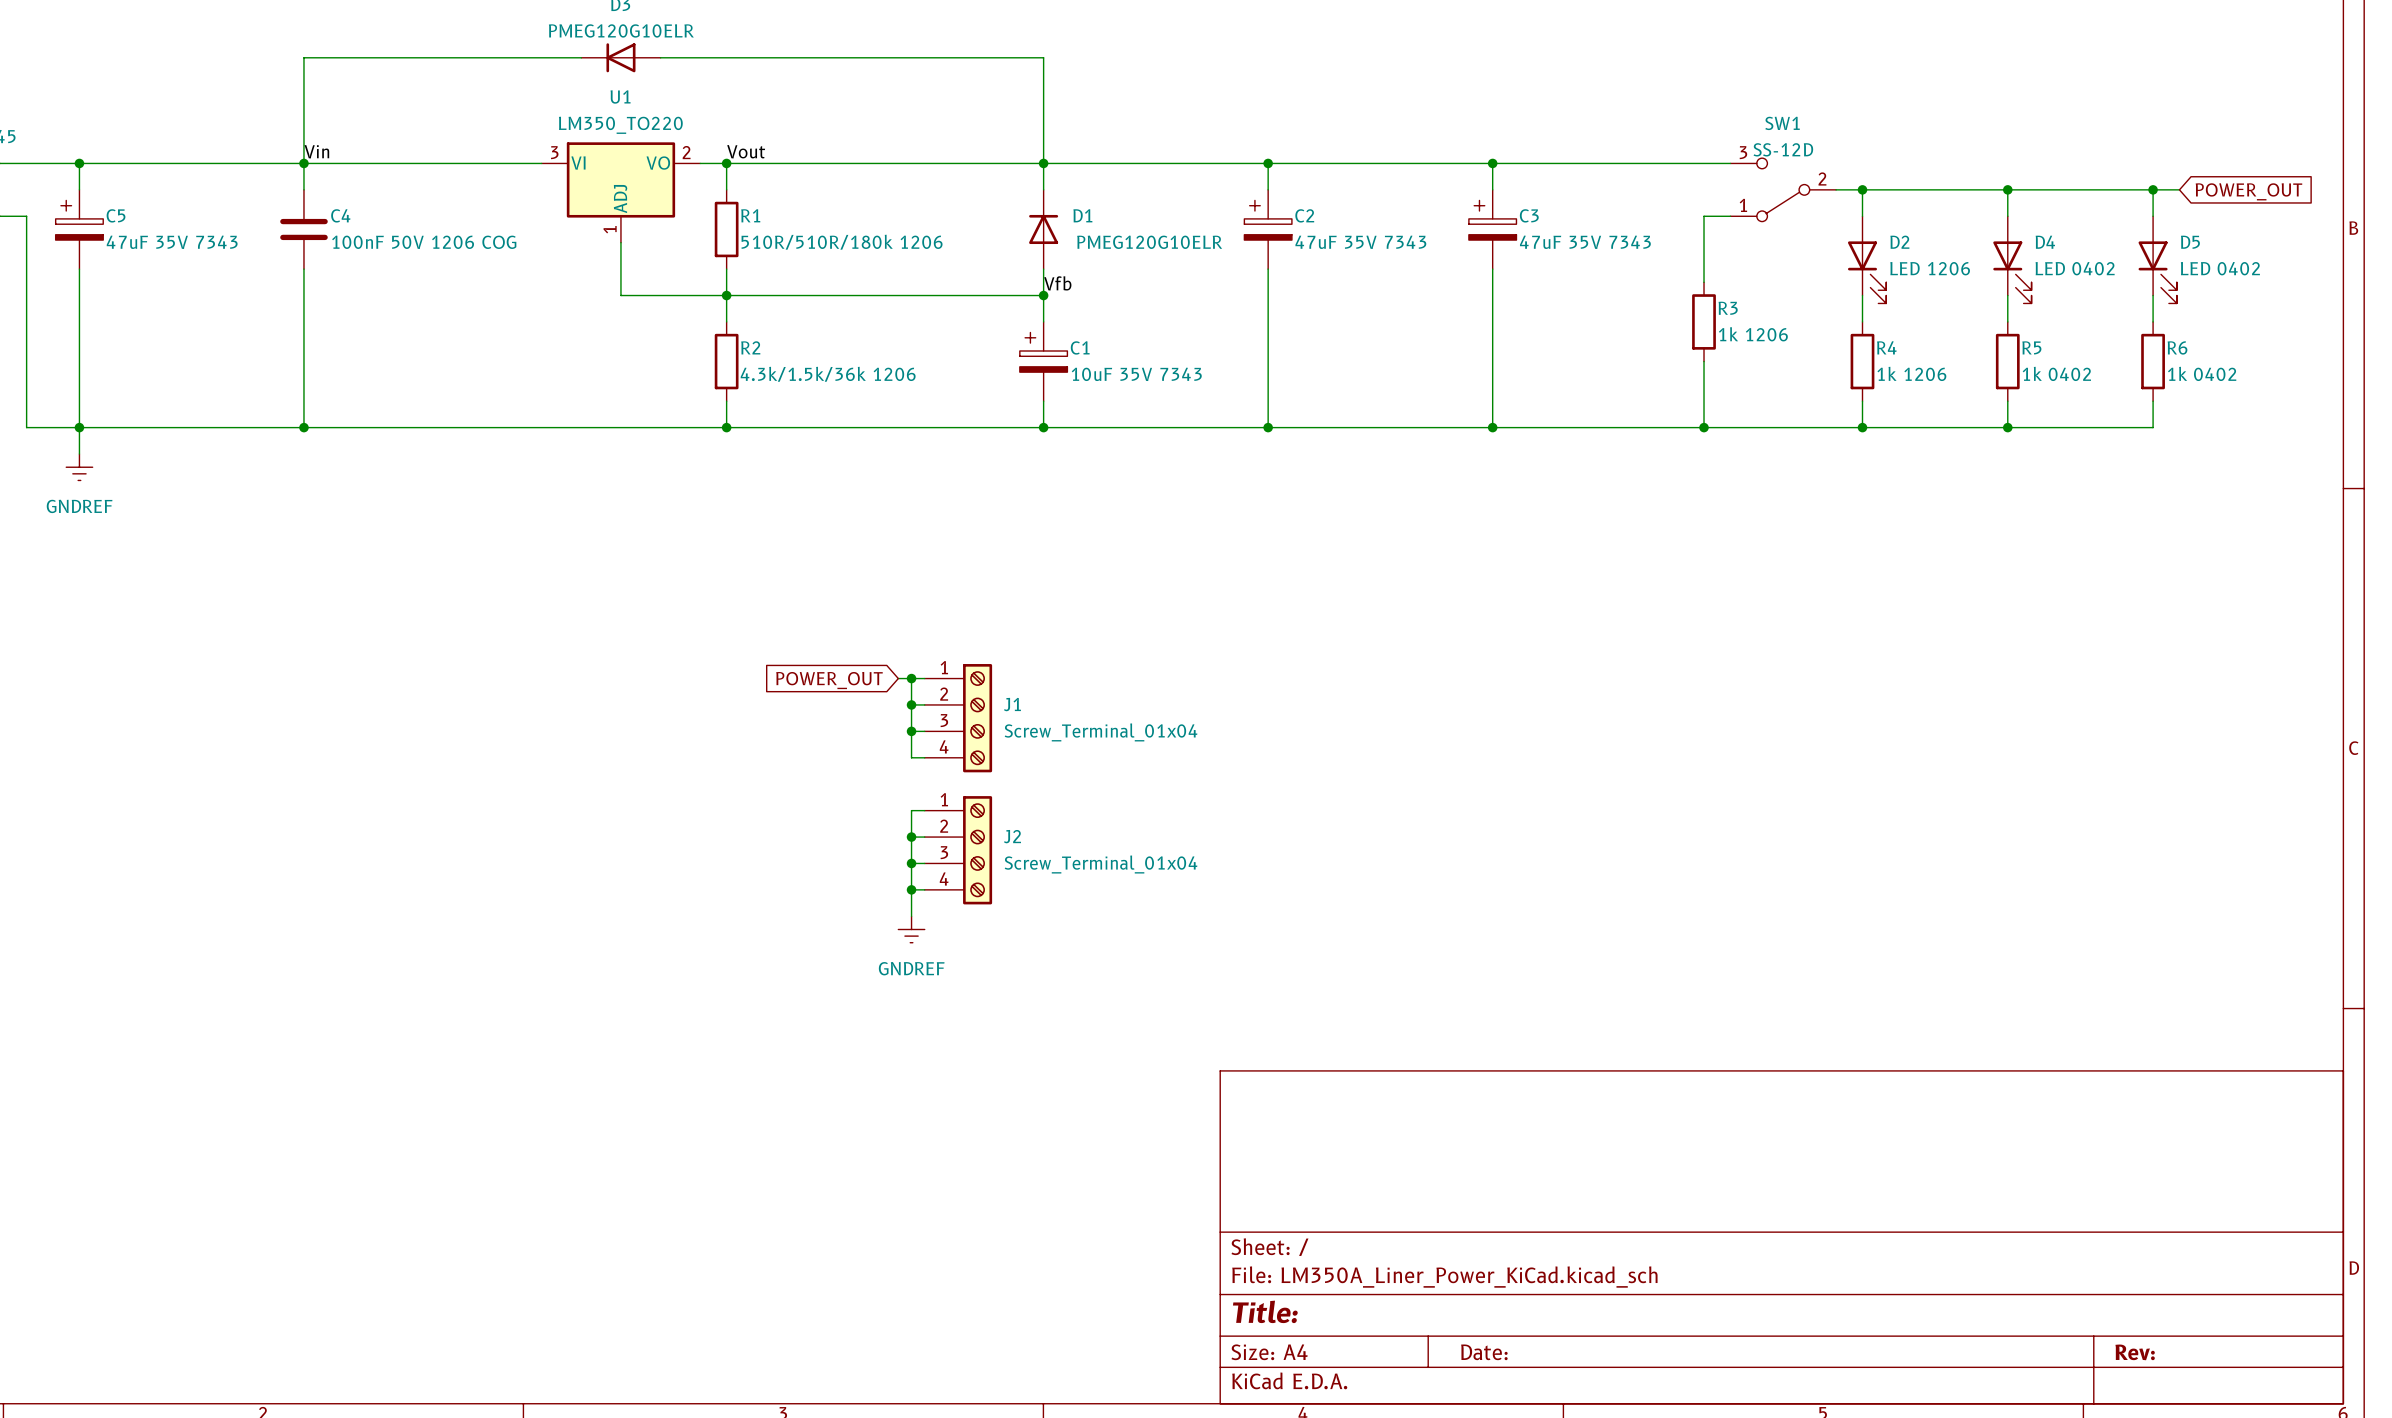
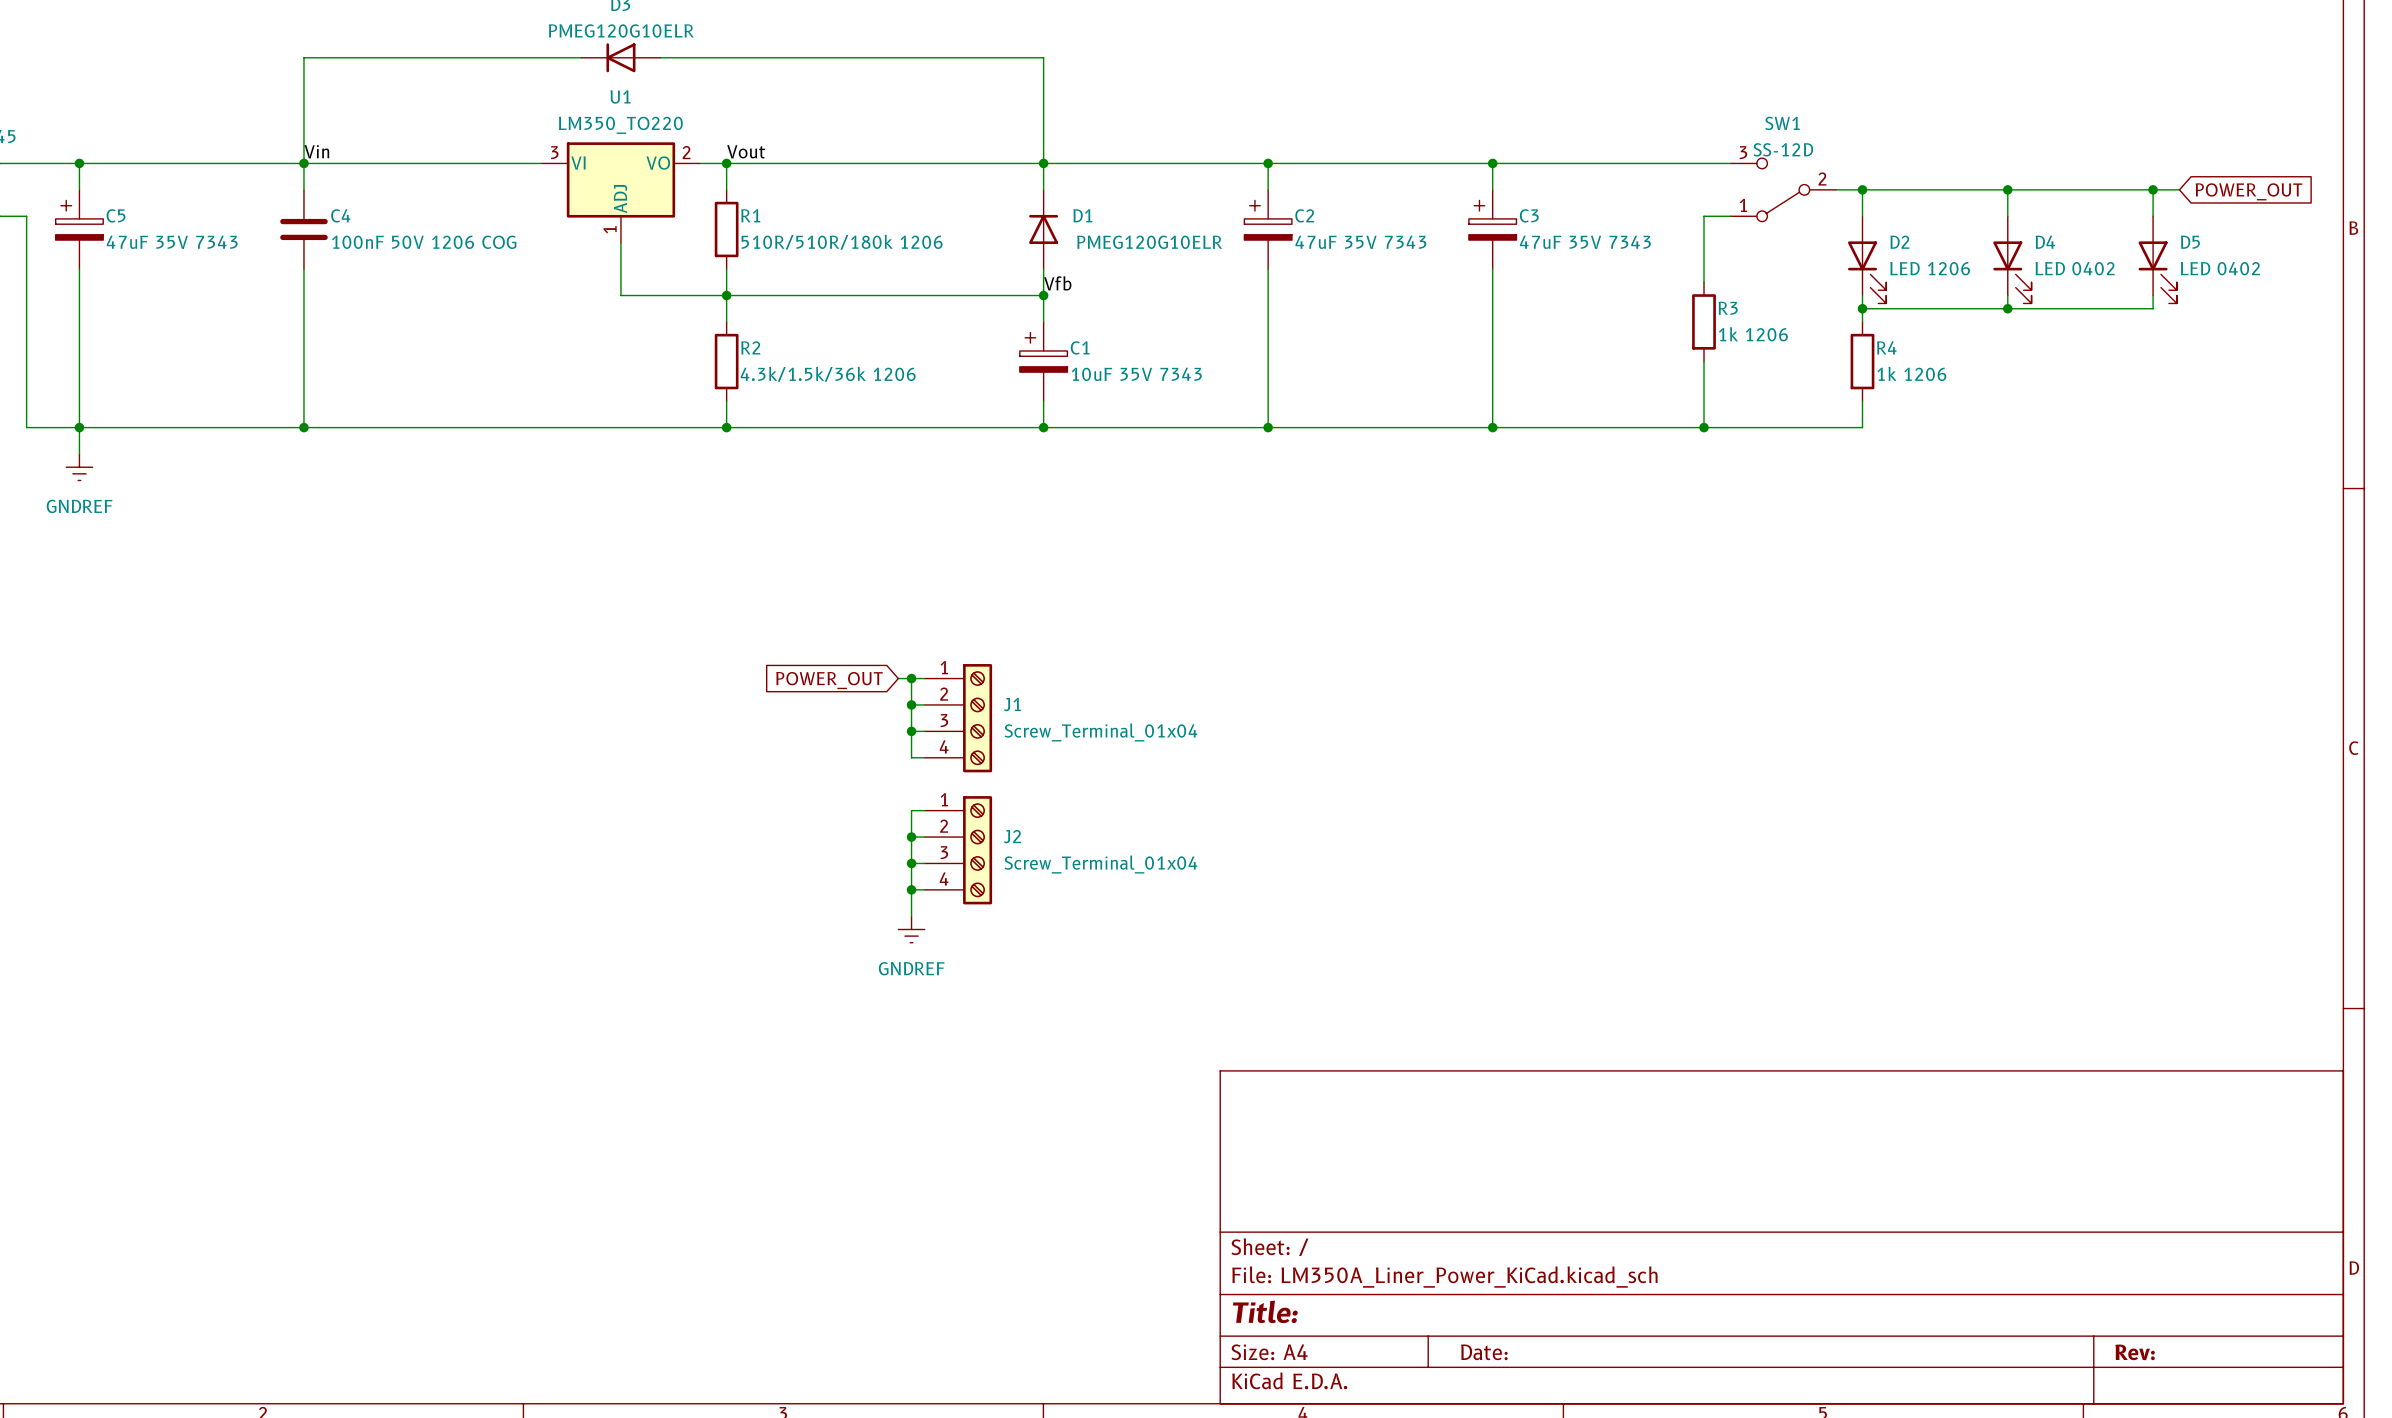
junction: none -> (1862, 308)
wire: (2007, 308) (2007, 321) -> none
junction: none -> (2007, 308)
wire: (2153, 308) (2153, 321) -> (2153, 308) (1862, 308)
R5: 1k 0402 (2007, 361) -> none
R6: 1k 0402 (2153, 361) -> none
wire: (2007, 401) (2007, 427) -> none
wire: (2153, 401) (2153, 427) (1862, 427) -> none
junction: (1862, 427) -> none
junction: (2007, 427) -> none

